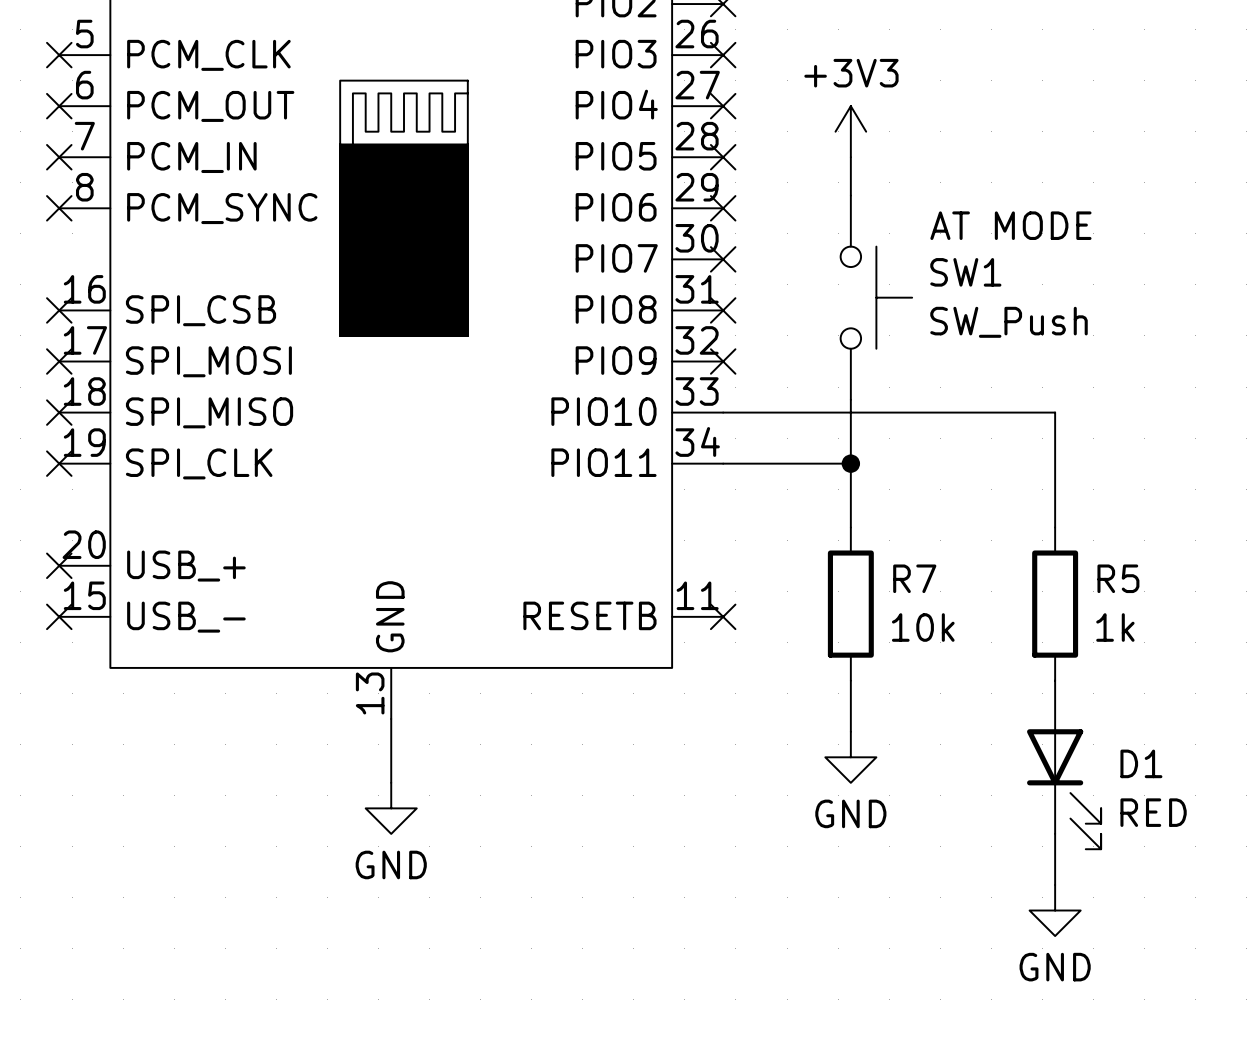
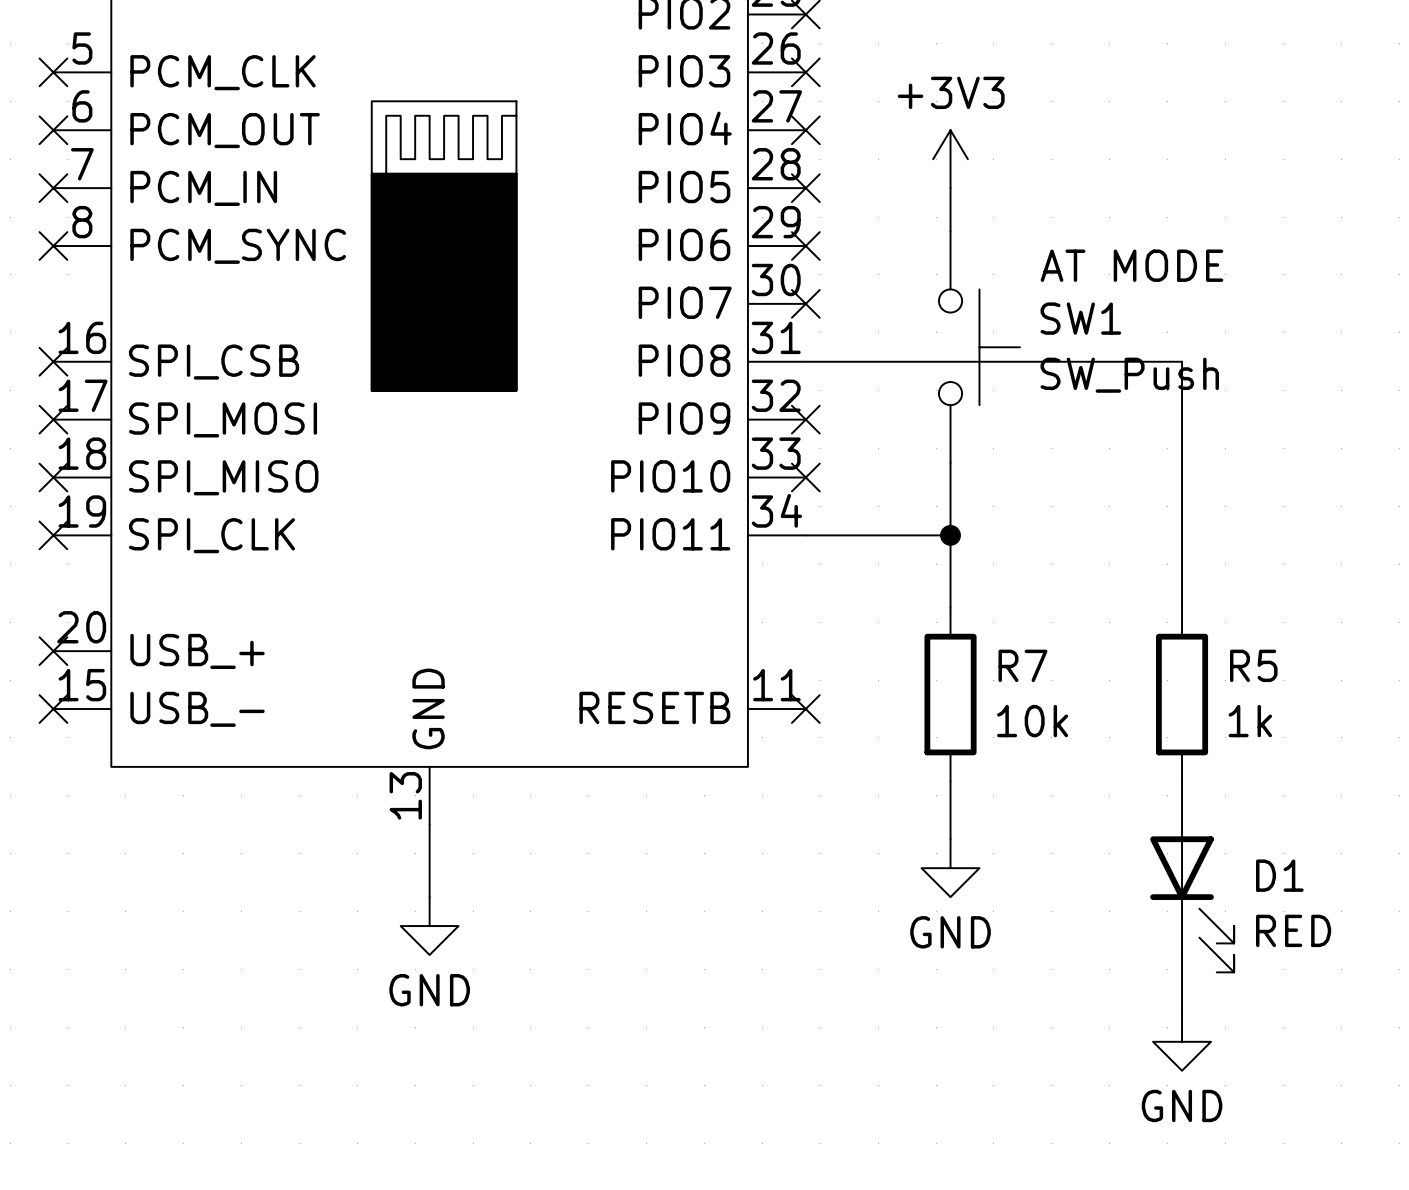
no-connect mark position: (723, 310) -> (805, 477)
wire: (723, 412) (1055, 412) -> (805, 361) (1182, 361) (1182, 477)

